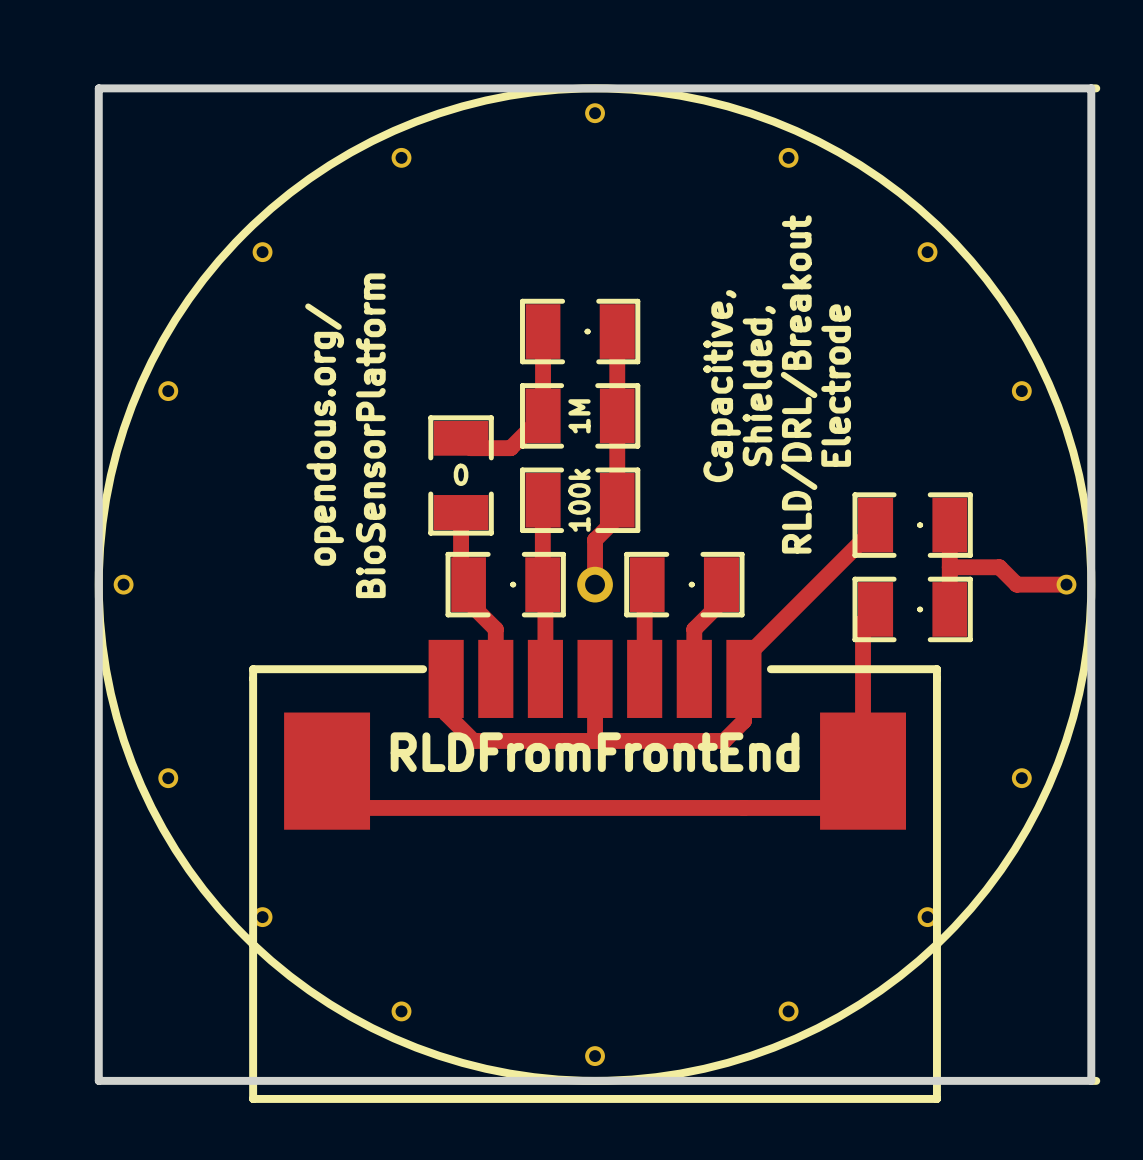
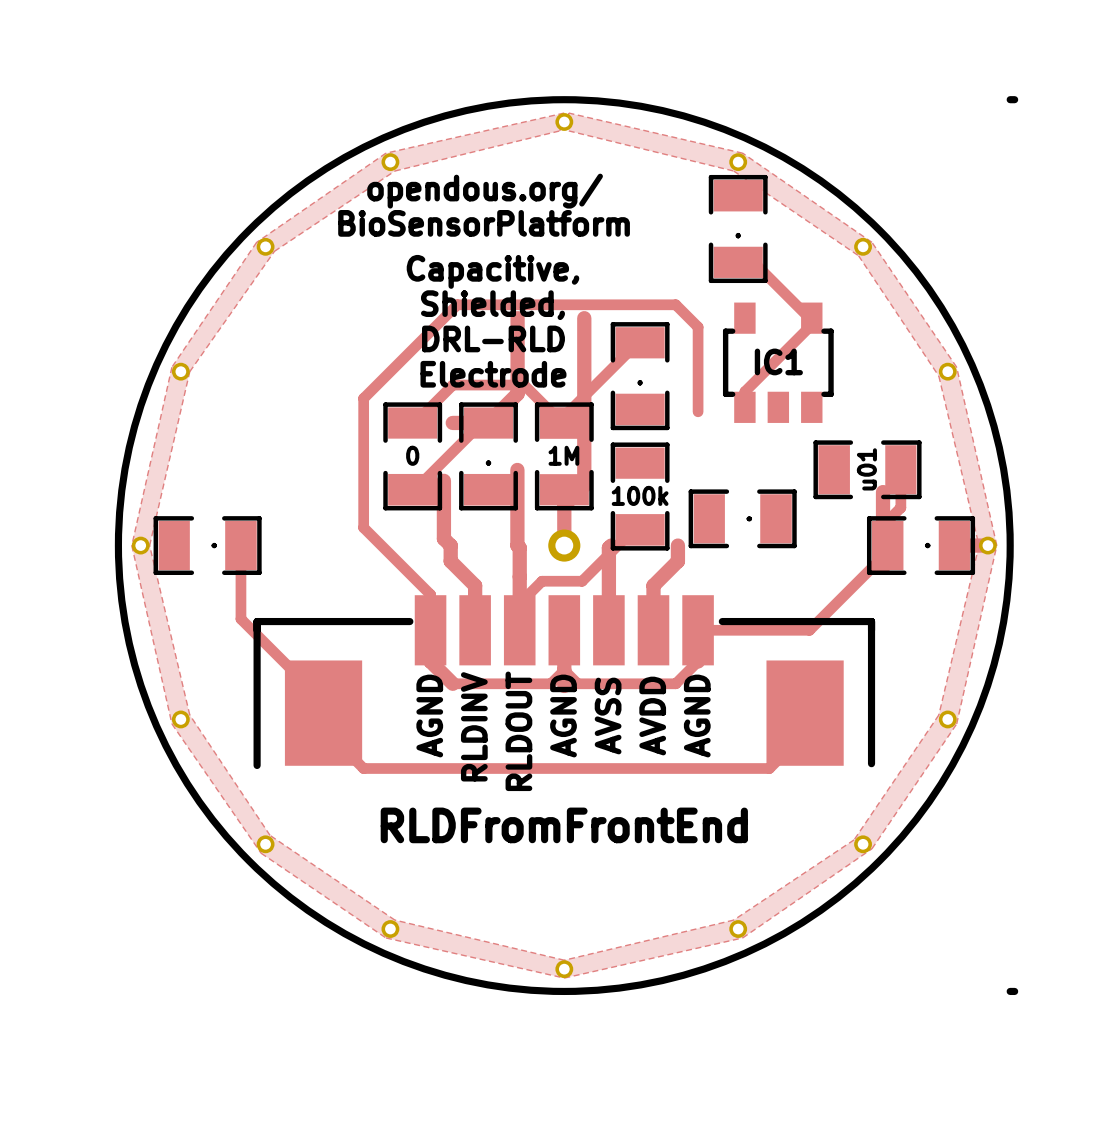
drawing: [94, 84, 1096, 1085] -> none
round board edge: none -> [114, 96, 1014, 996]
board edge: (98, 88) (98, 1080) (1091, 1080) (1091, 88) (98, 88) -> none
zone outline: none -> (564, 113) (559, 130) (394, 171) (274, 251) (189, 371) (149, 545) (189, 715) (270, 835) (394, 920) (564, 960) (733, 920) (854, 839) (938, 715) (978, 545) (938, 376) (858, 255) (733, 171) (568, 130) (568, 113) (742, 153) (871, 242) (956, 367) (996, 545) (956, 723) (871, 848) (742, 937) (564, 978) (385, 937) (261, 853) (171, 723) (131, 545) (171, 367) (256, 242) (385, 153) (564, 113)
part: none -> . (738, 228)
track: none -> (738, 262) (753, 262) (809, 318) (811, 318) (811, 324) (744, 391) (744, 407)
part: . (580, 331) -> none
text: none -> DRL-RLD (493, 338)
track: none -> (640, 342) (637, 342) (564, 416) (564, 423) (524, 385) (452, 385) (412, 423)
IC1: none -> (778, 362)
text: RLD/DRL/Breakout (799, 384) -> none
text rotation: 0° (836, 385) -> 90° clockwise (493, 374)
text position: Electrode (836, 385) -> Electrode (493, 374)
text rotation: 0° (722, 386) -> 90° clockwise (492, 271)
text rotation: 0° (759, 386) -> 90° clockwise (492, 305)
text position: Shielded, (759, 386) -> Shielded, (492, 305)
part: none -> . (640, 376)
part: 1M (580, 415) -> none
text rotation: 0° (324, 434) -> 90° clockwise (485, 191)
text rotation: 0° (370, 435) -> 90° clockwise (484, 223)
track: none -> (698, 411) (698, 327) (675, 304) (457, 304) (363, 398) (363, 527) (430, 594) (430, 630)
track: none -> (481, 423) (415, 489) (412, 489)
part position: (461, 475) -> (412, 456)
part: none -> . (488, 456)
part value: 100k (579, 500) -> 1M (563, 455)
part rotation: 0° (580, 500) -> 90° clockwise (564, 456)
track: (875, 525) (875, 527) (743, 659) (743, 678) -> (900, 469) (900, 507) (887, 520) (887, 552) (809, 630) (698, 630)
part position: (912, 525) -> (867, 469)
part value: . (920, 525) -> u01 (866, 469)
part: none -> 100k (640, 496)
part: none -> . (742, 518)
track: none -> (640, 529) (633, 529) (582, 581) (542, 581) (519, 603)
track: (949, 567) (999, 567) (1016, 584) (1029, 584) -> none
part: none -> . (207, 545)
track: none -> (240, 545) (240, 619) (323, 701) (323, 728) (363, 768) (769, 768) (805, 732) (805, 713)
part: . (505, 584) -> none
part: . (684, 584) -> none
part: none -> . (921, 545)
track: (875, 609) (863, 621) (863, 771) (826, 807) (363, 807) (327, 771) -> none
part: . (912, 609) -> none
track: (743, 713) (743, 721) (724, 740) (473, 740) (470, 738) -> (698, 661) (675, 683) (577, 683) (564, 670) (550, 683) (452, 683)
part: none -> RLDFromFrontEnd (564, 682)
part: RLDFromFrontEnd (595, 871) -> none

